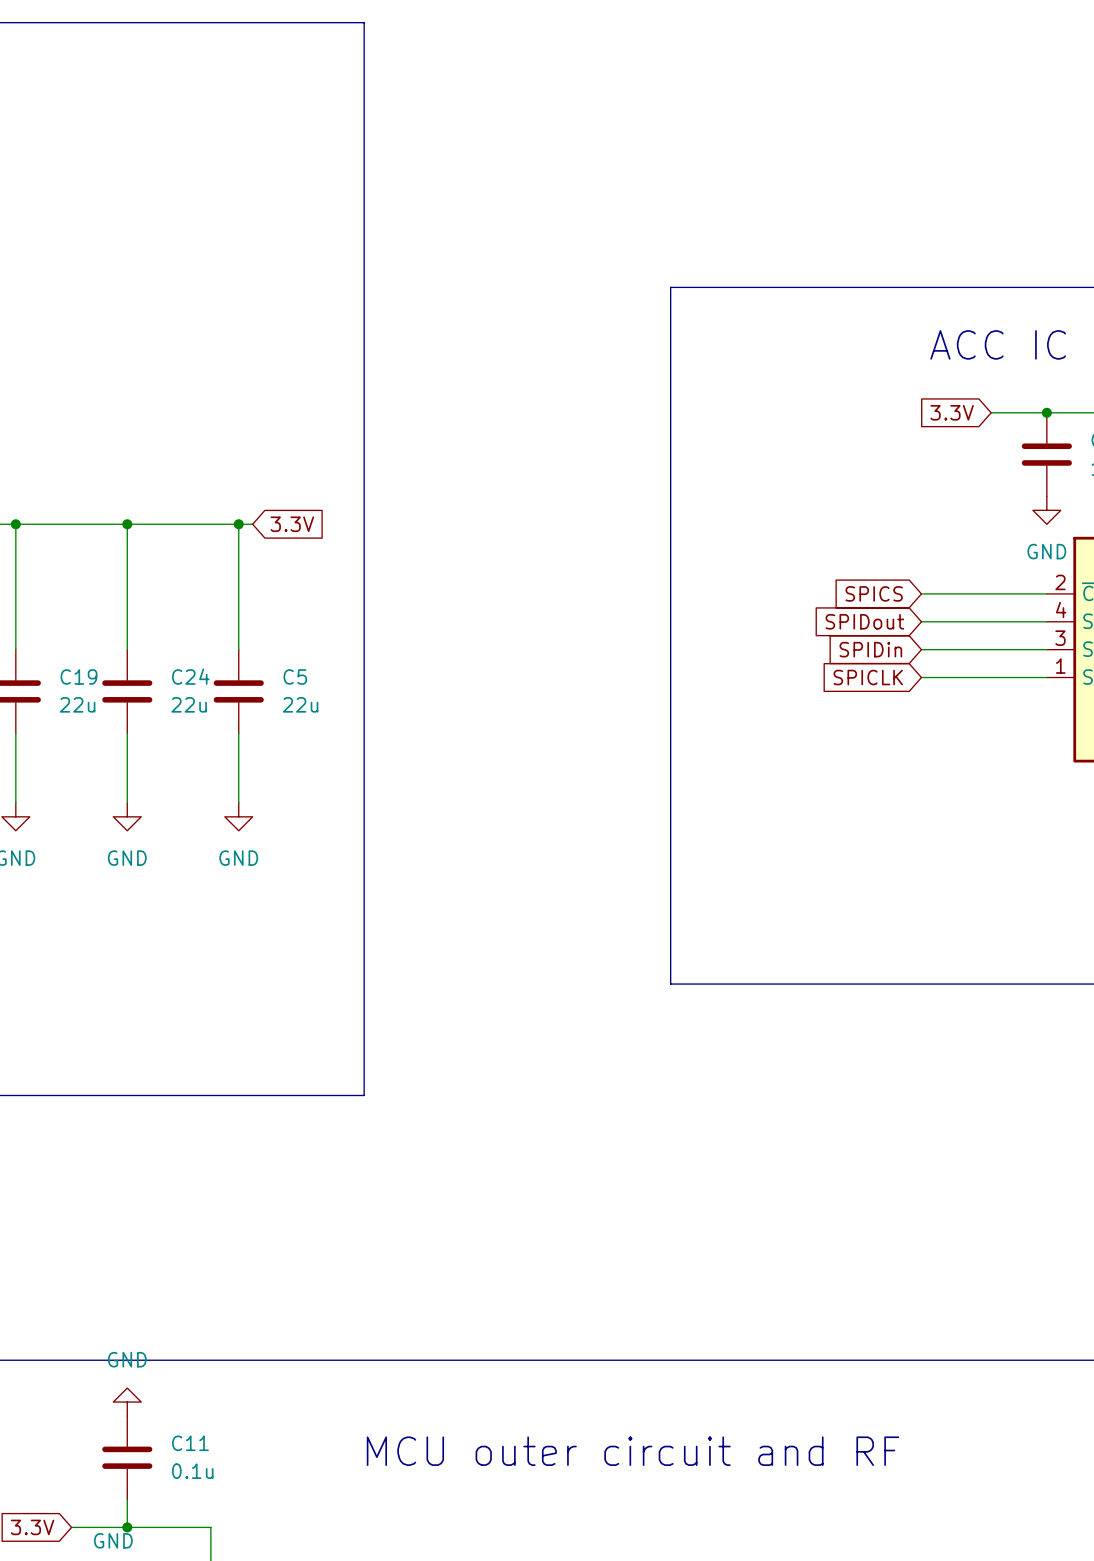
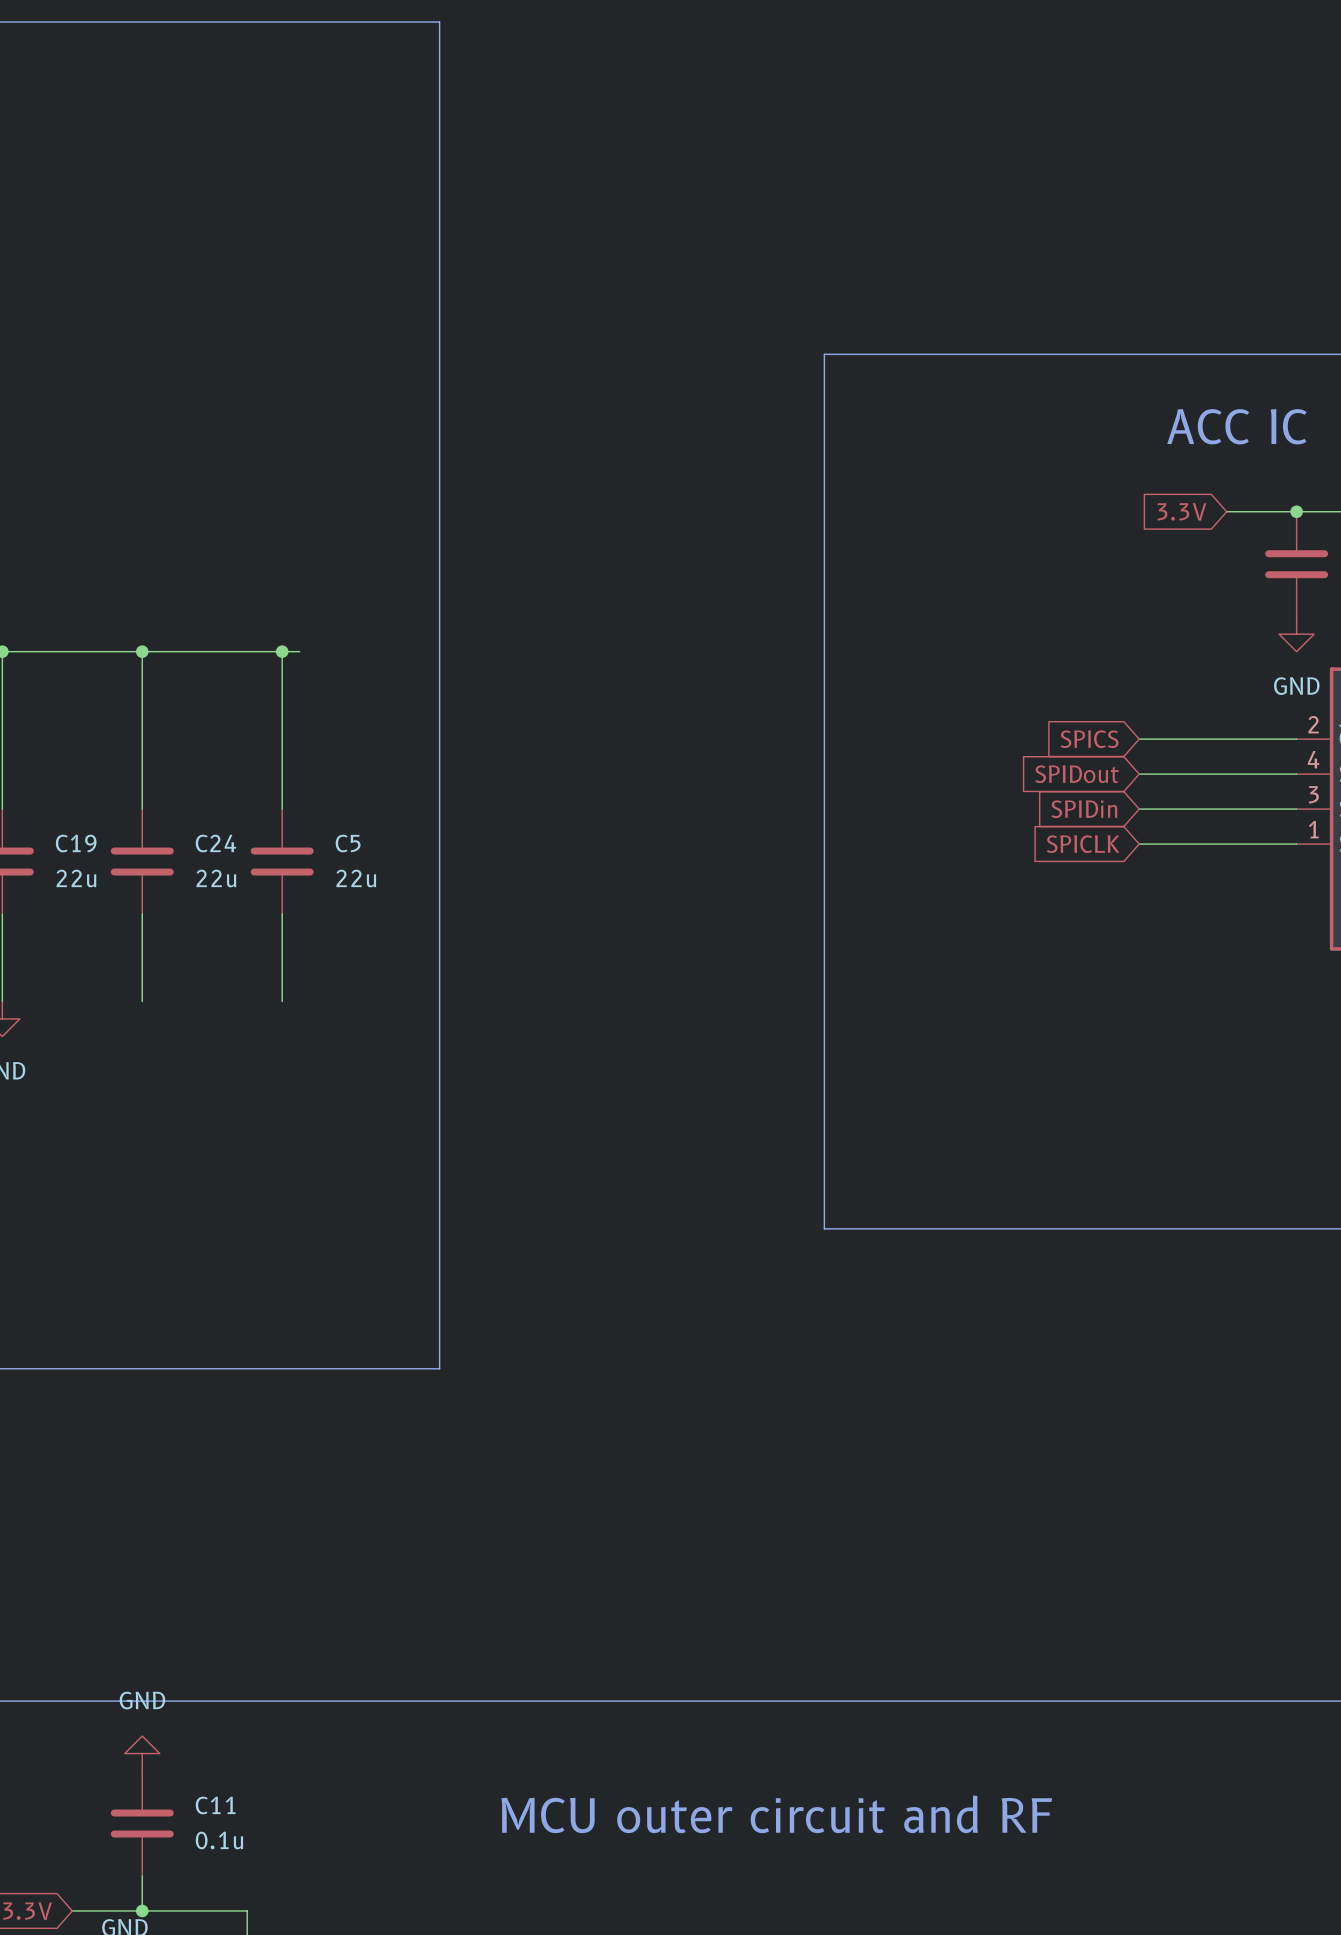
global label: 3.3V (292, 524) -> none
power symbol: GND (127, 816) -> none
power symbol: GND (238, 816) -> none

